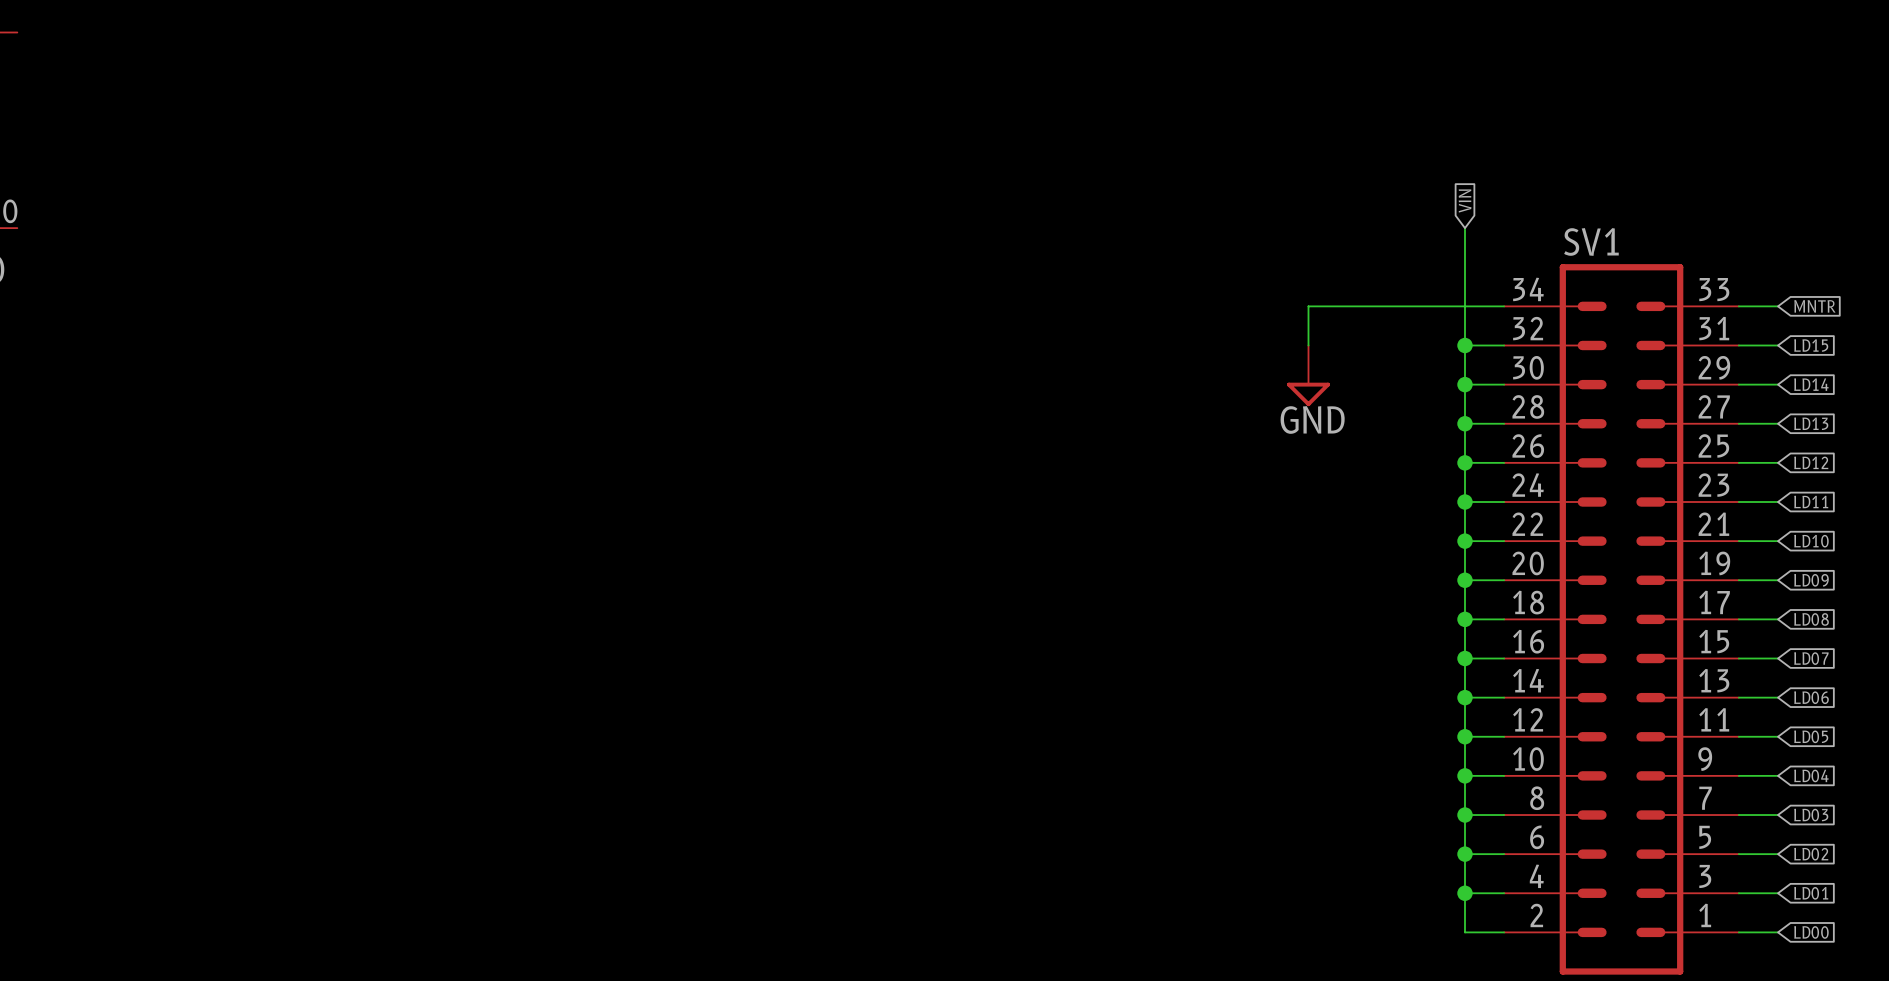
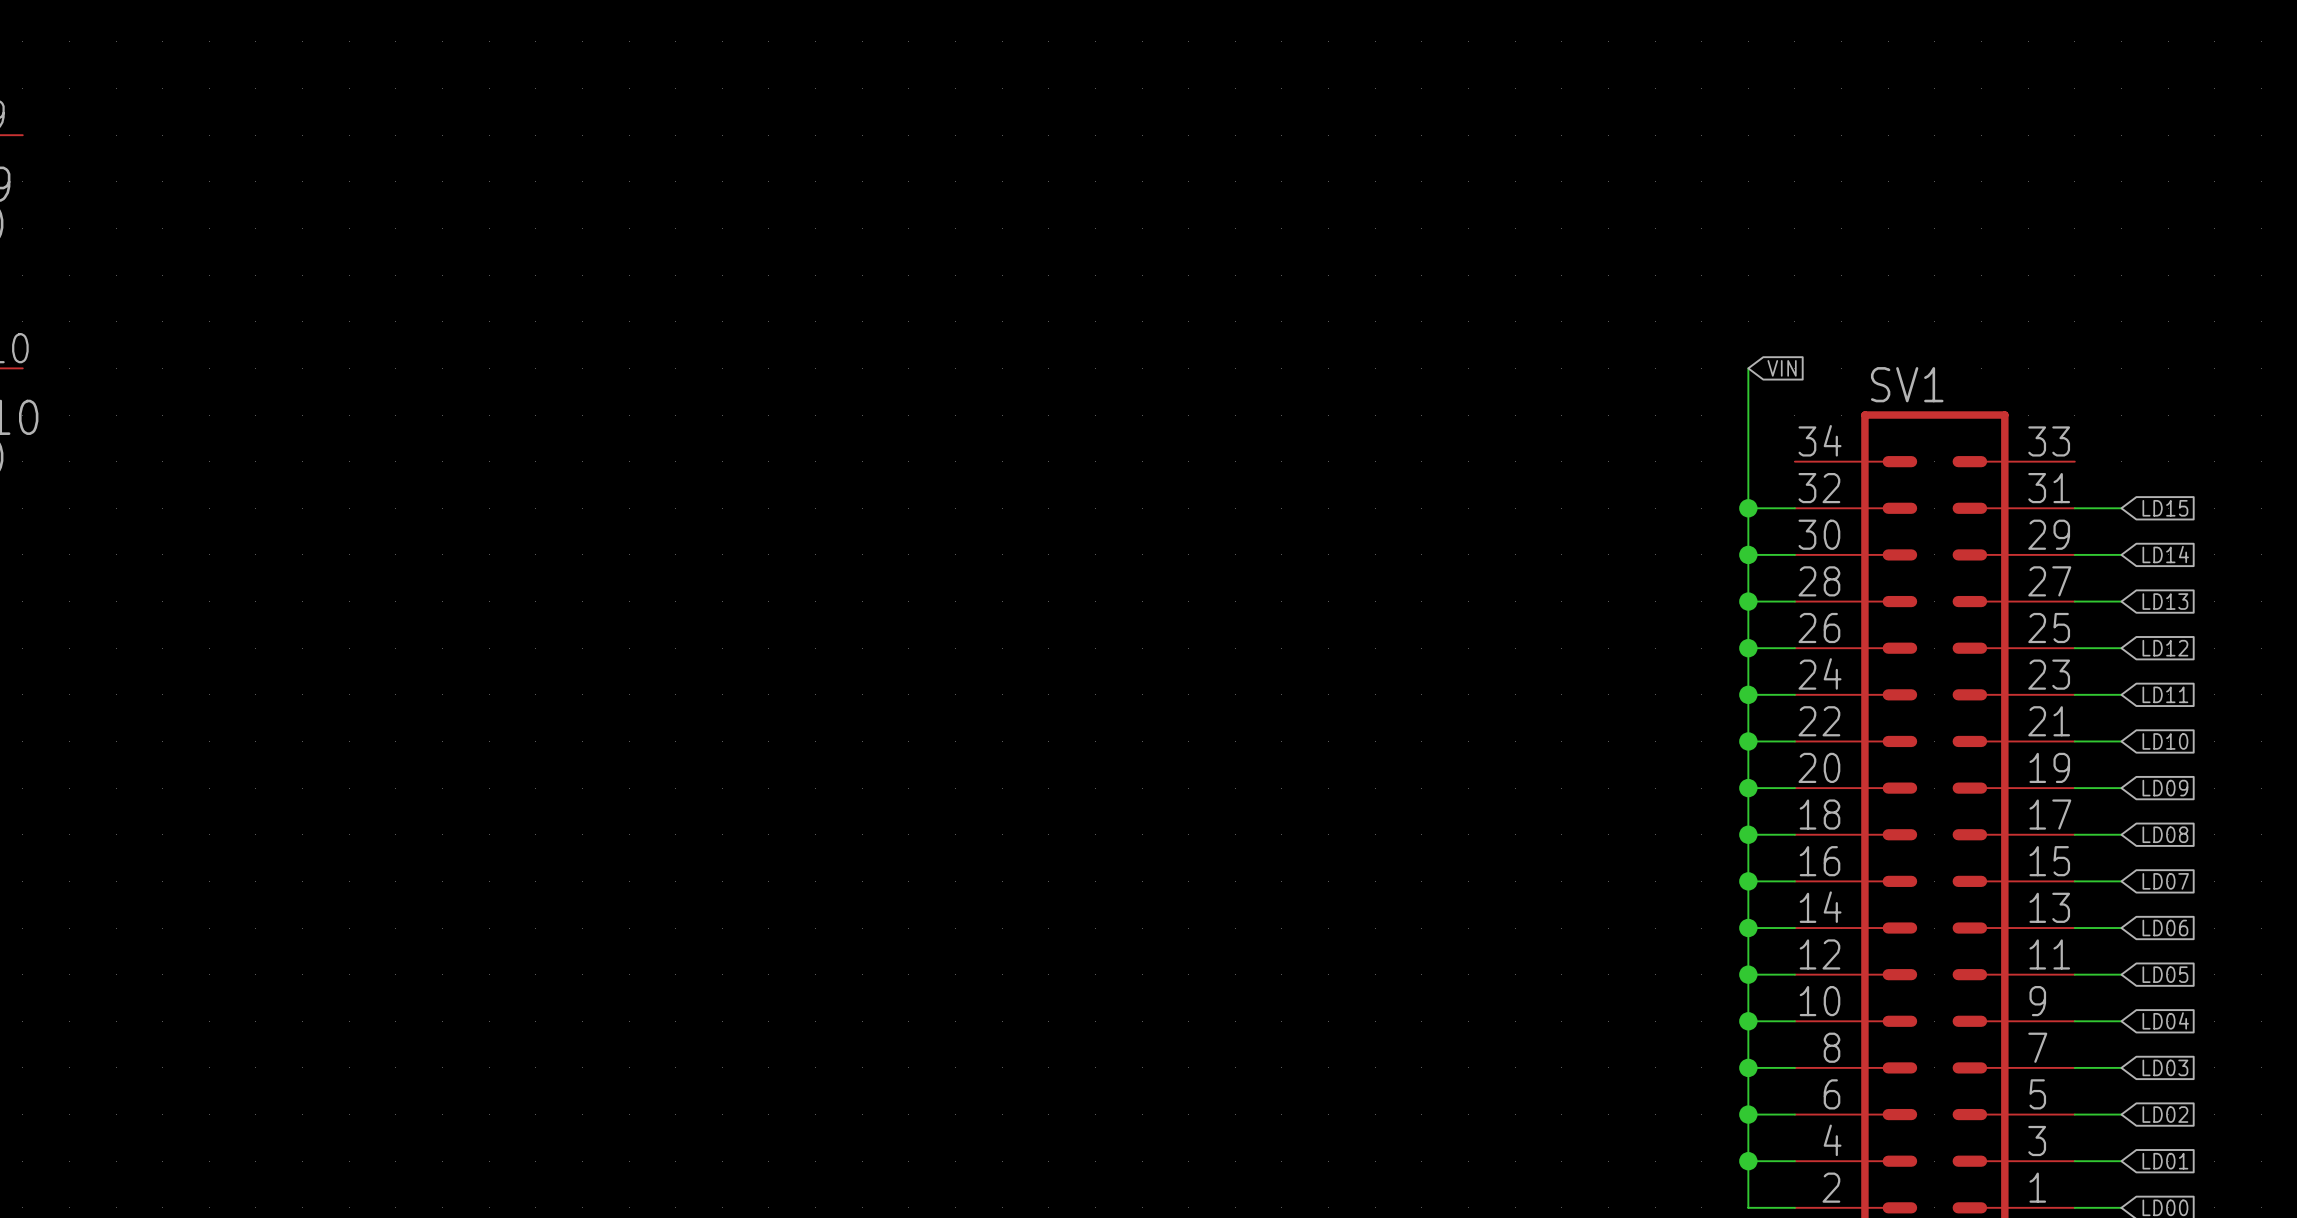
global label rotation: 0° (1465, 201) -> 90° clockwise (1782, 368)
wire: (1504, 306) (1308, 306) (1308, 345) -> none
wire: (1738, 306) (1778, 306) -> none
global label: MNTR (1814, 306) -> none
power symbol: GND (1308, 375) -> none

